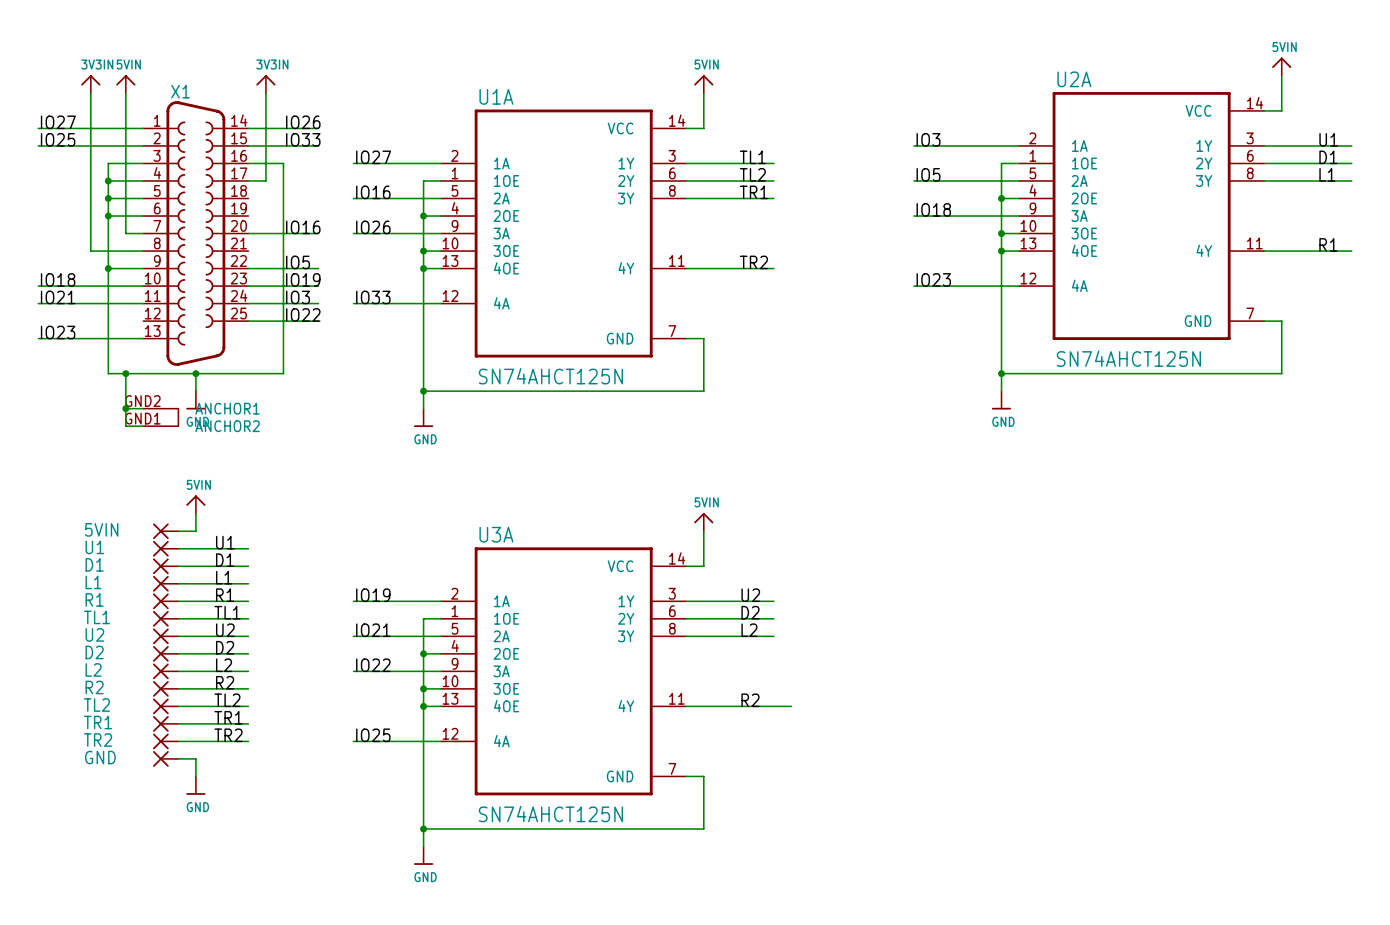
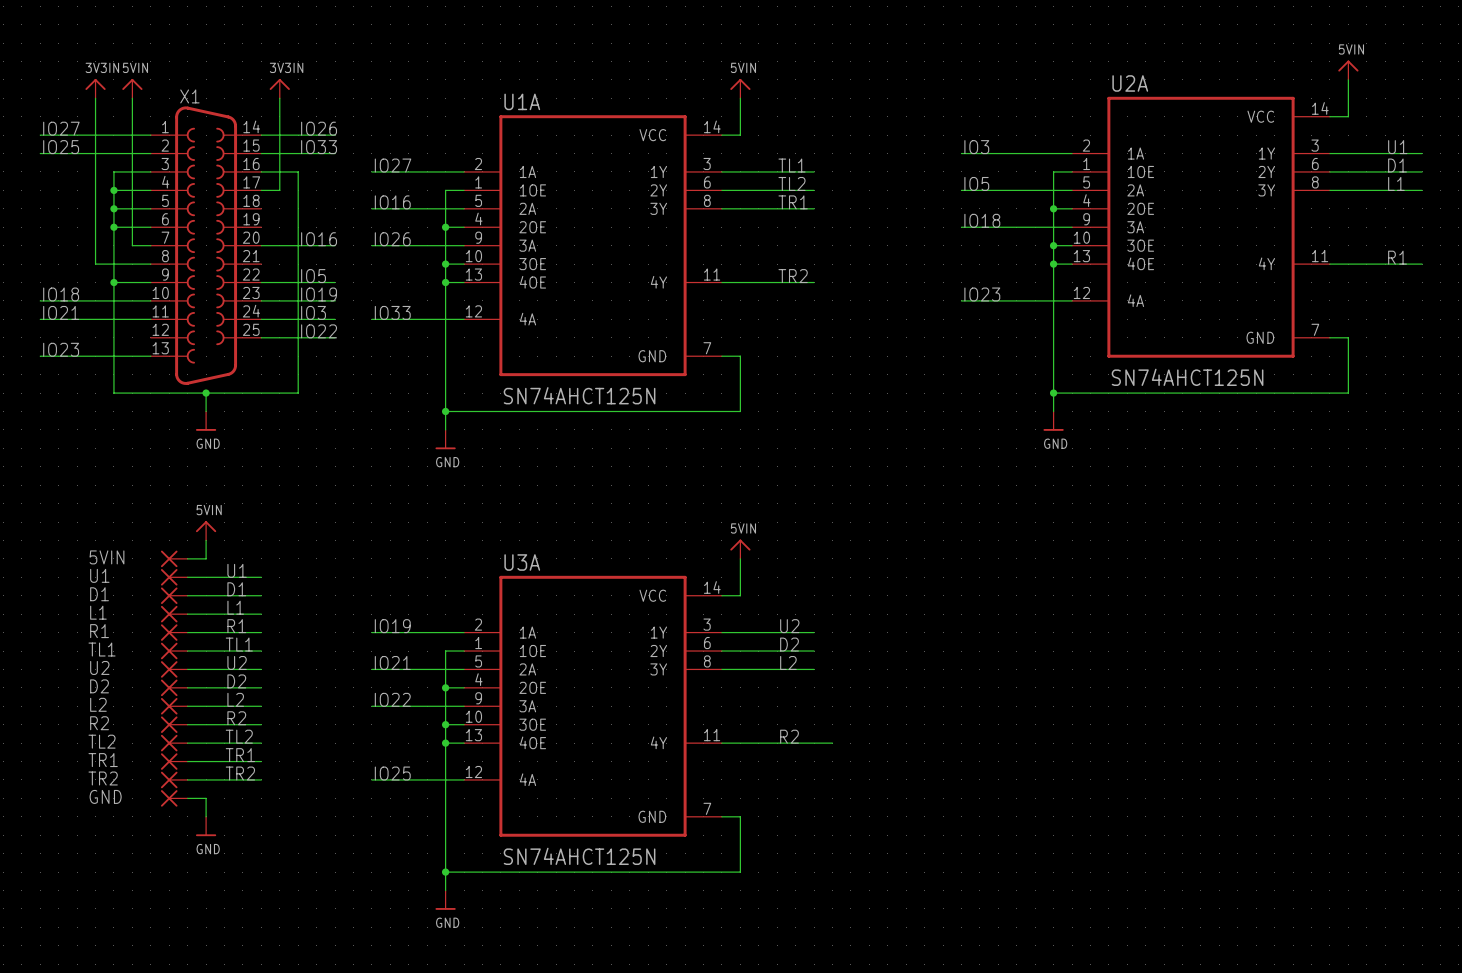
X1 symbol: [143, 101, 249, 427] -> [150, 106, 262, 385]
wire: (125, 373) (125, 426) (143, 426) -> none
junction: (125, 373) -> none
wire: (125, 408) (143, 408) -> none
junction: (125, 408) -> none

